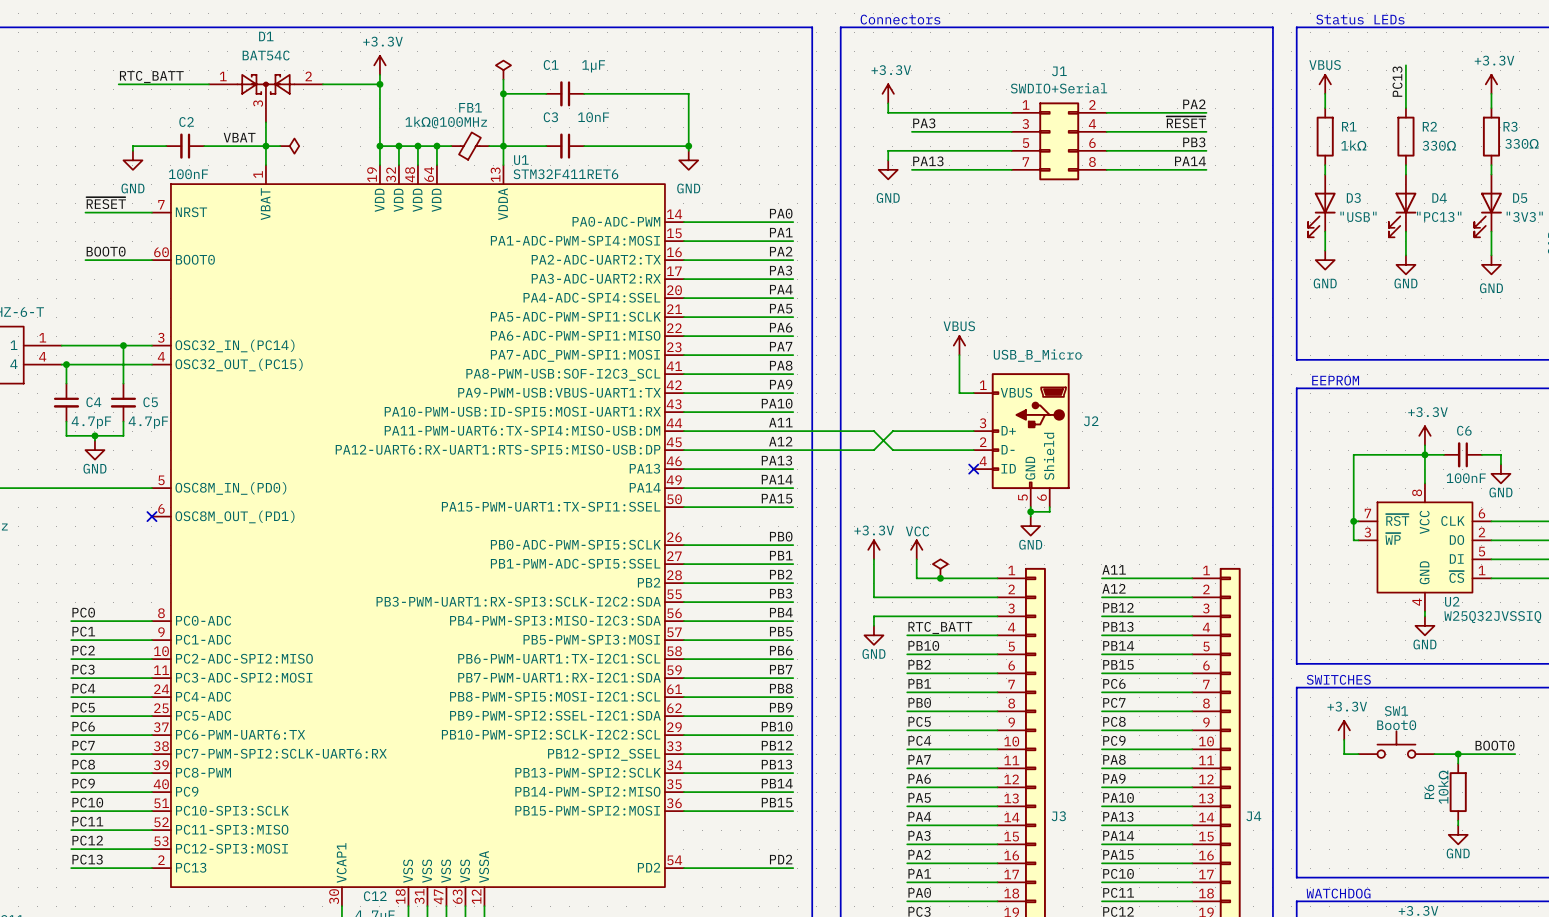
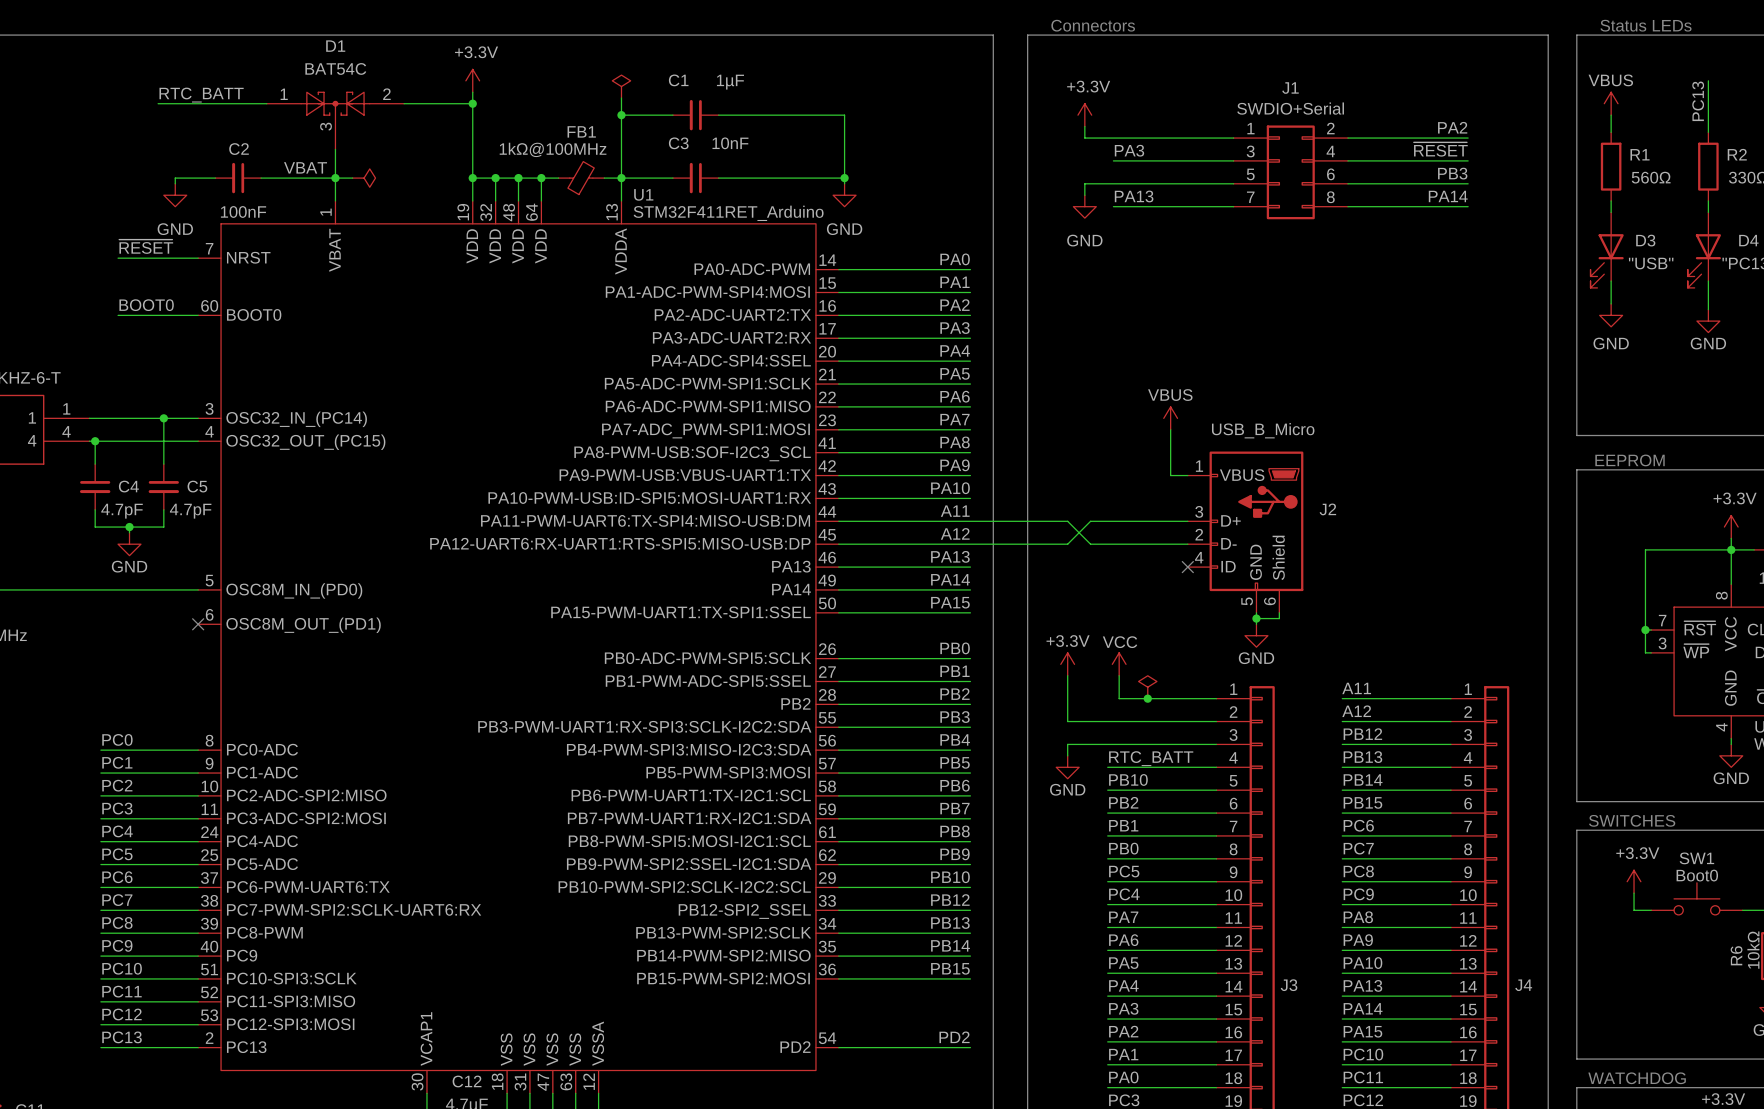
R1 value: 1kΩ (1353, 145) -> 560Ω (1651, 177)
U1 value: STM32F411RET6 (565, 174) -> STM32F411RET_Arduino (728, 213)

